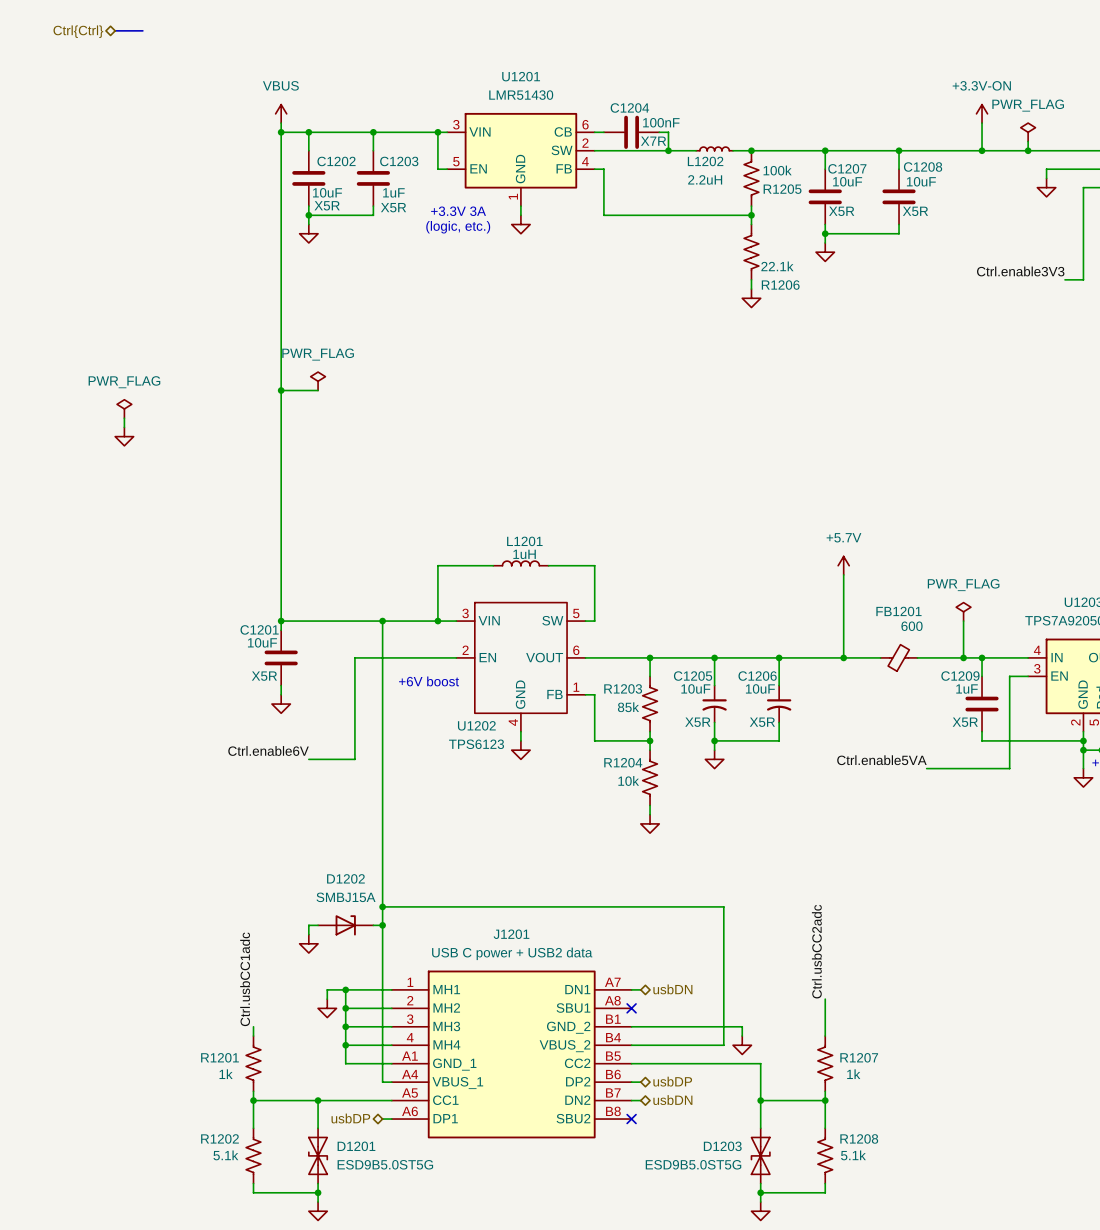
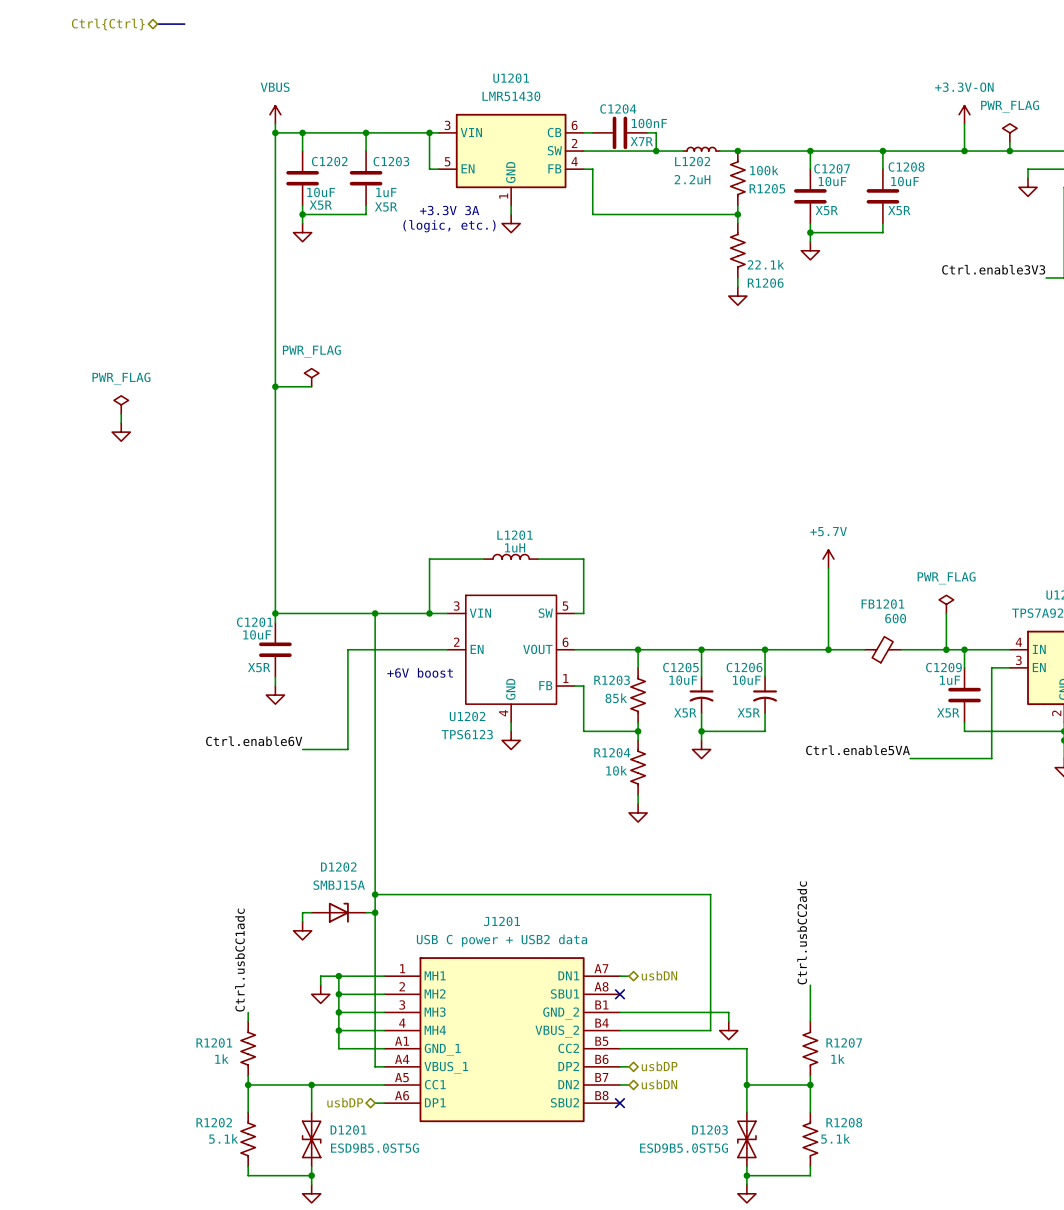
bus: (115, 30) (142, 30) -> (157, 24) (184, 24)
hierarchical label position: Ctrl{Ctrl} (78, 31) -> Ctrl{Ctrl} (108, 24)

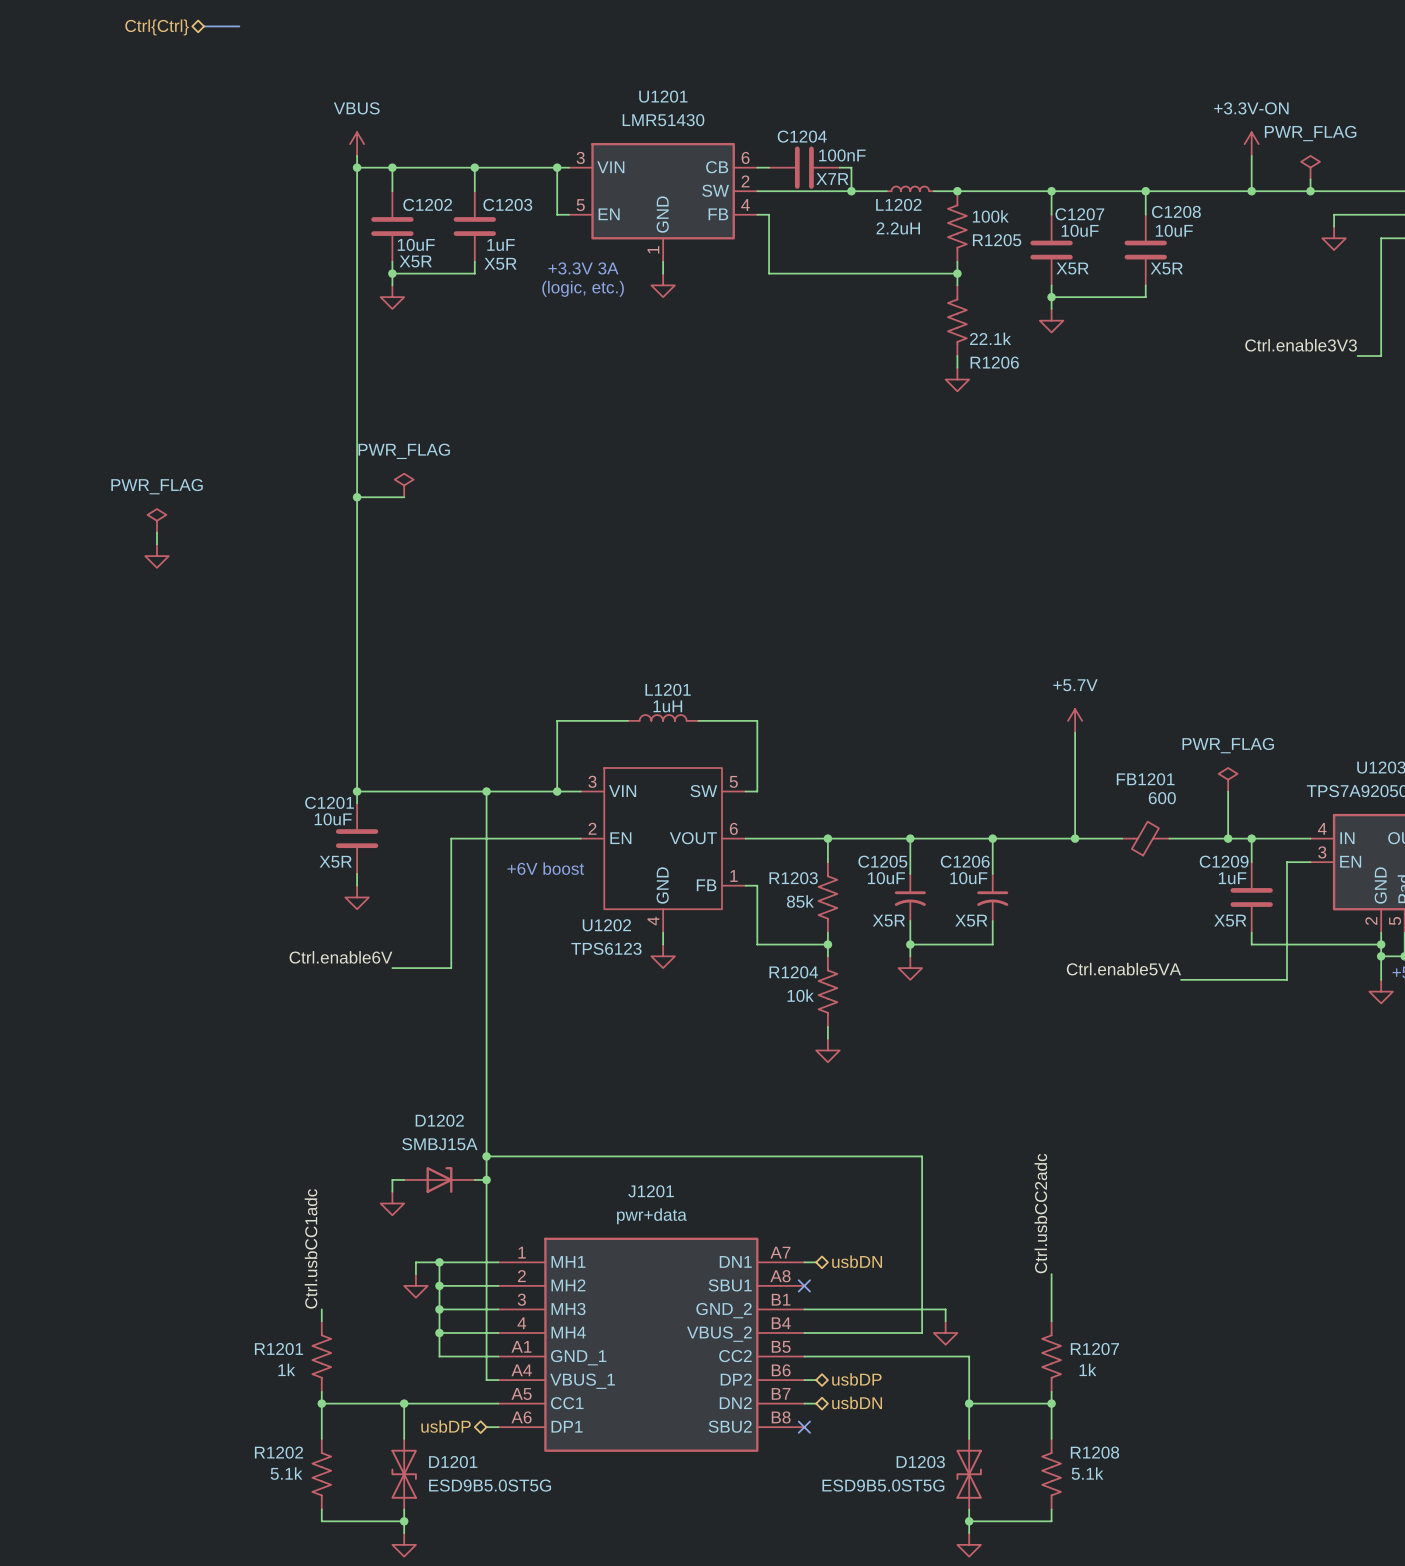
J1201 value: USB C power + USB2 data (501, 940) -> pwr+data (651, 1216)

